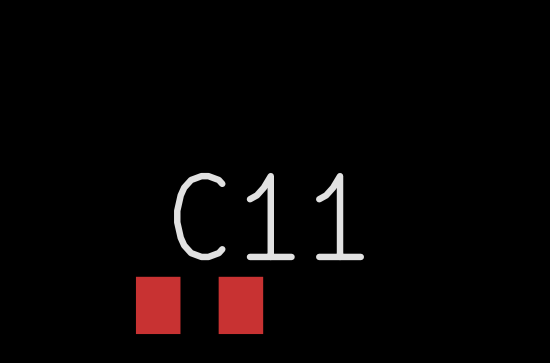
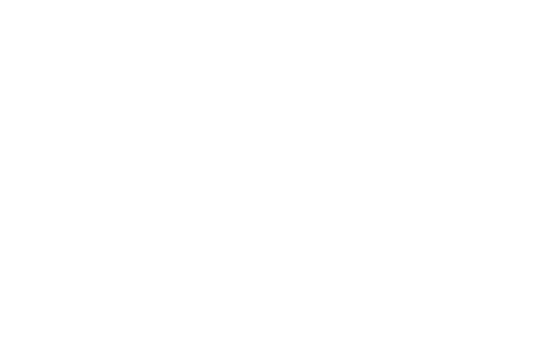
C11: (199, 305) -> none

